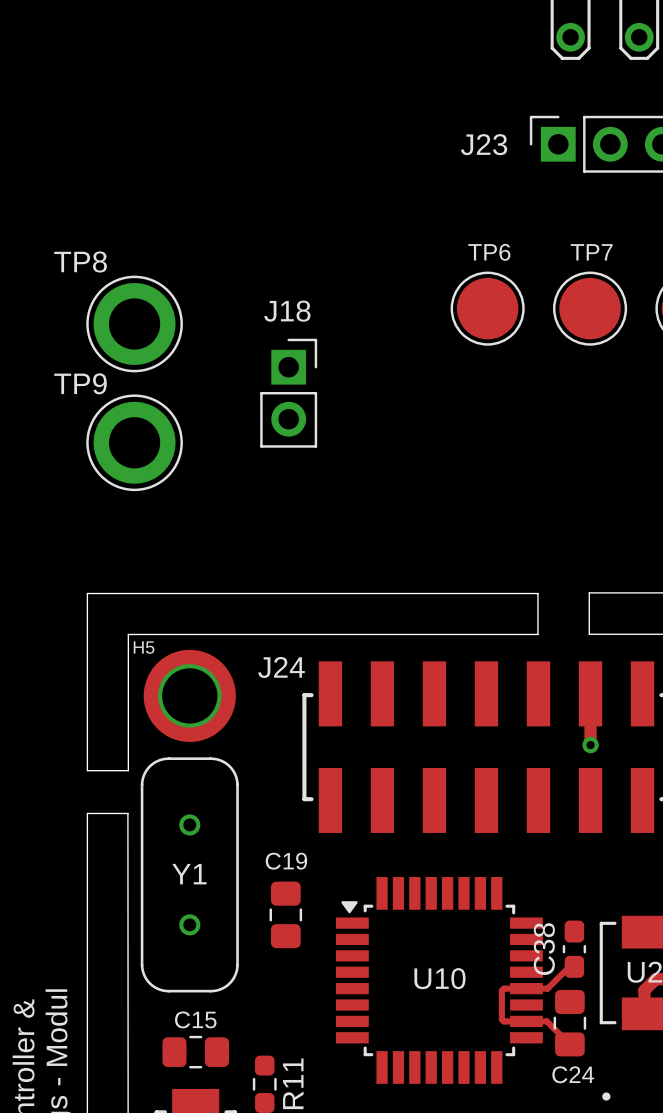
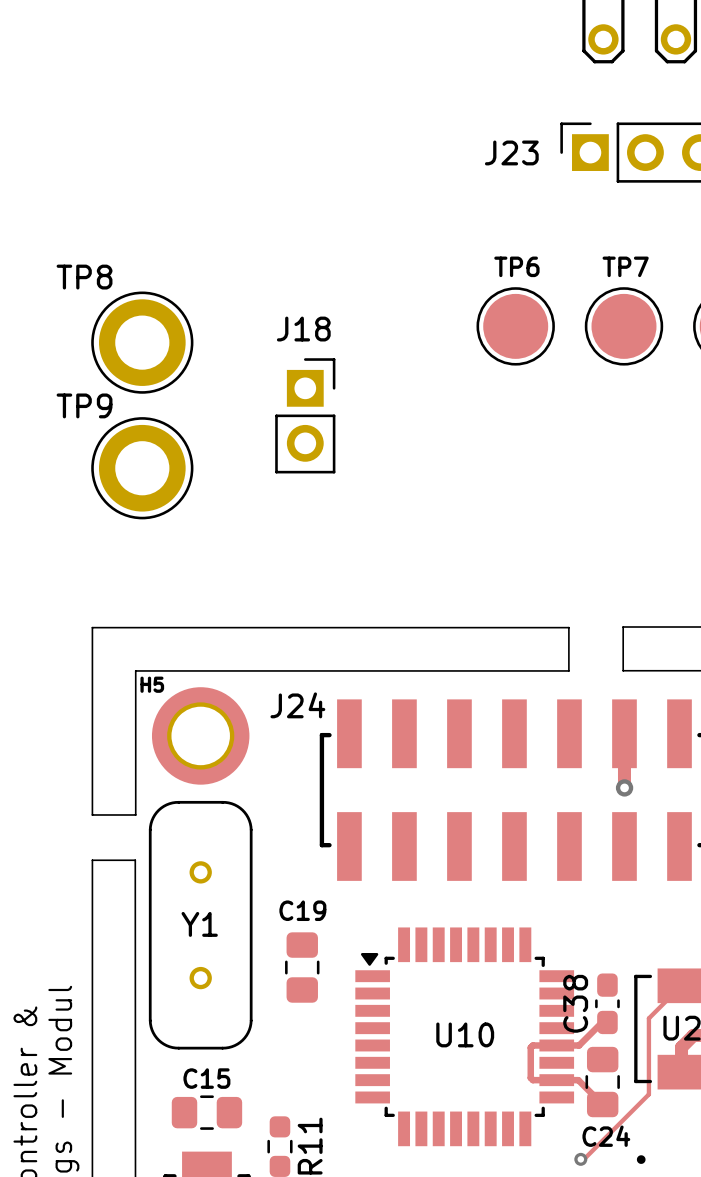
track: none -> (681, 985) (648, 1018) (648, 1094) (583, 1159) (580, 1159)
via: none -> (580, 1159)

